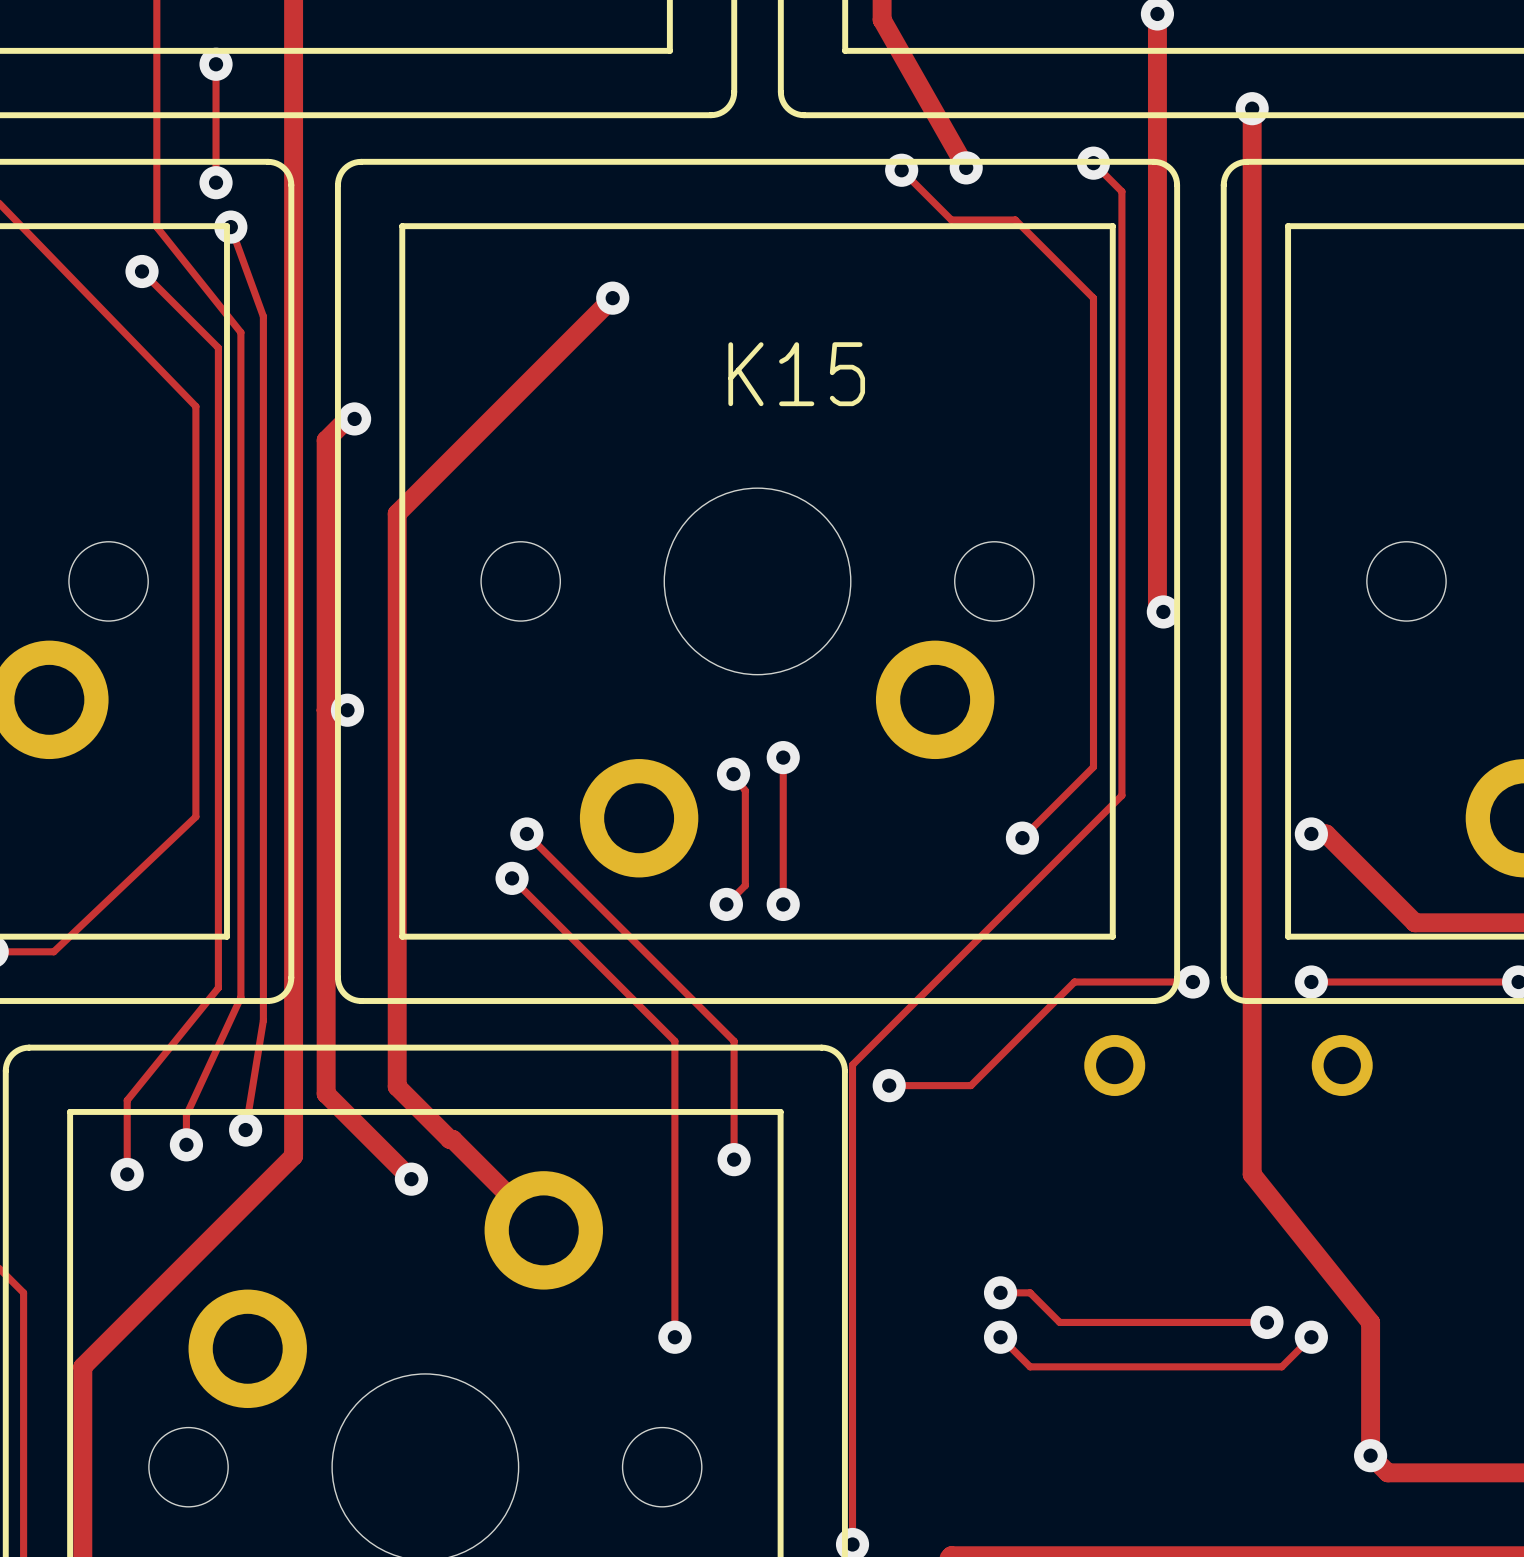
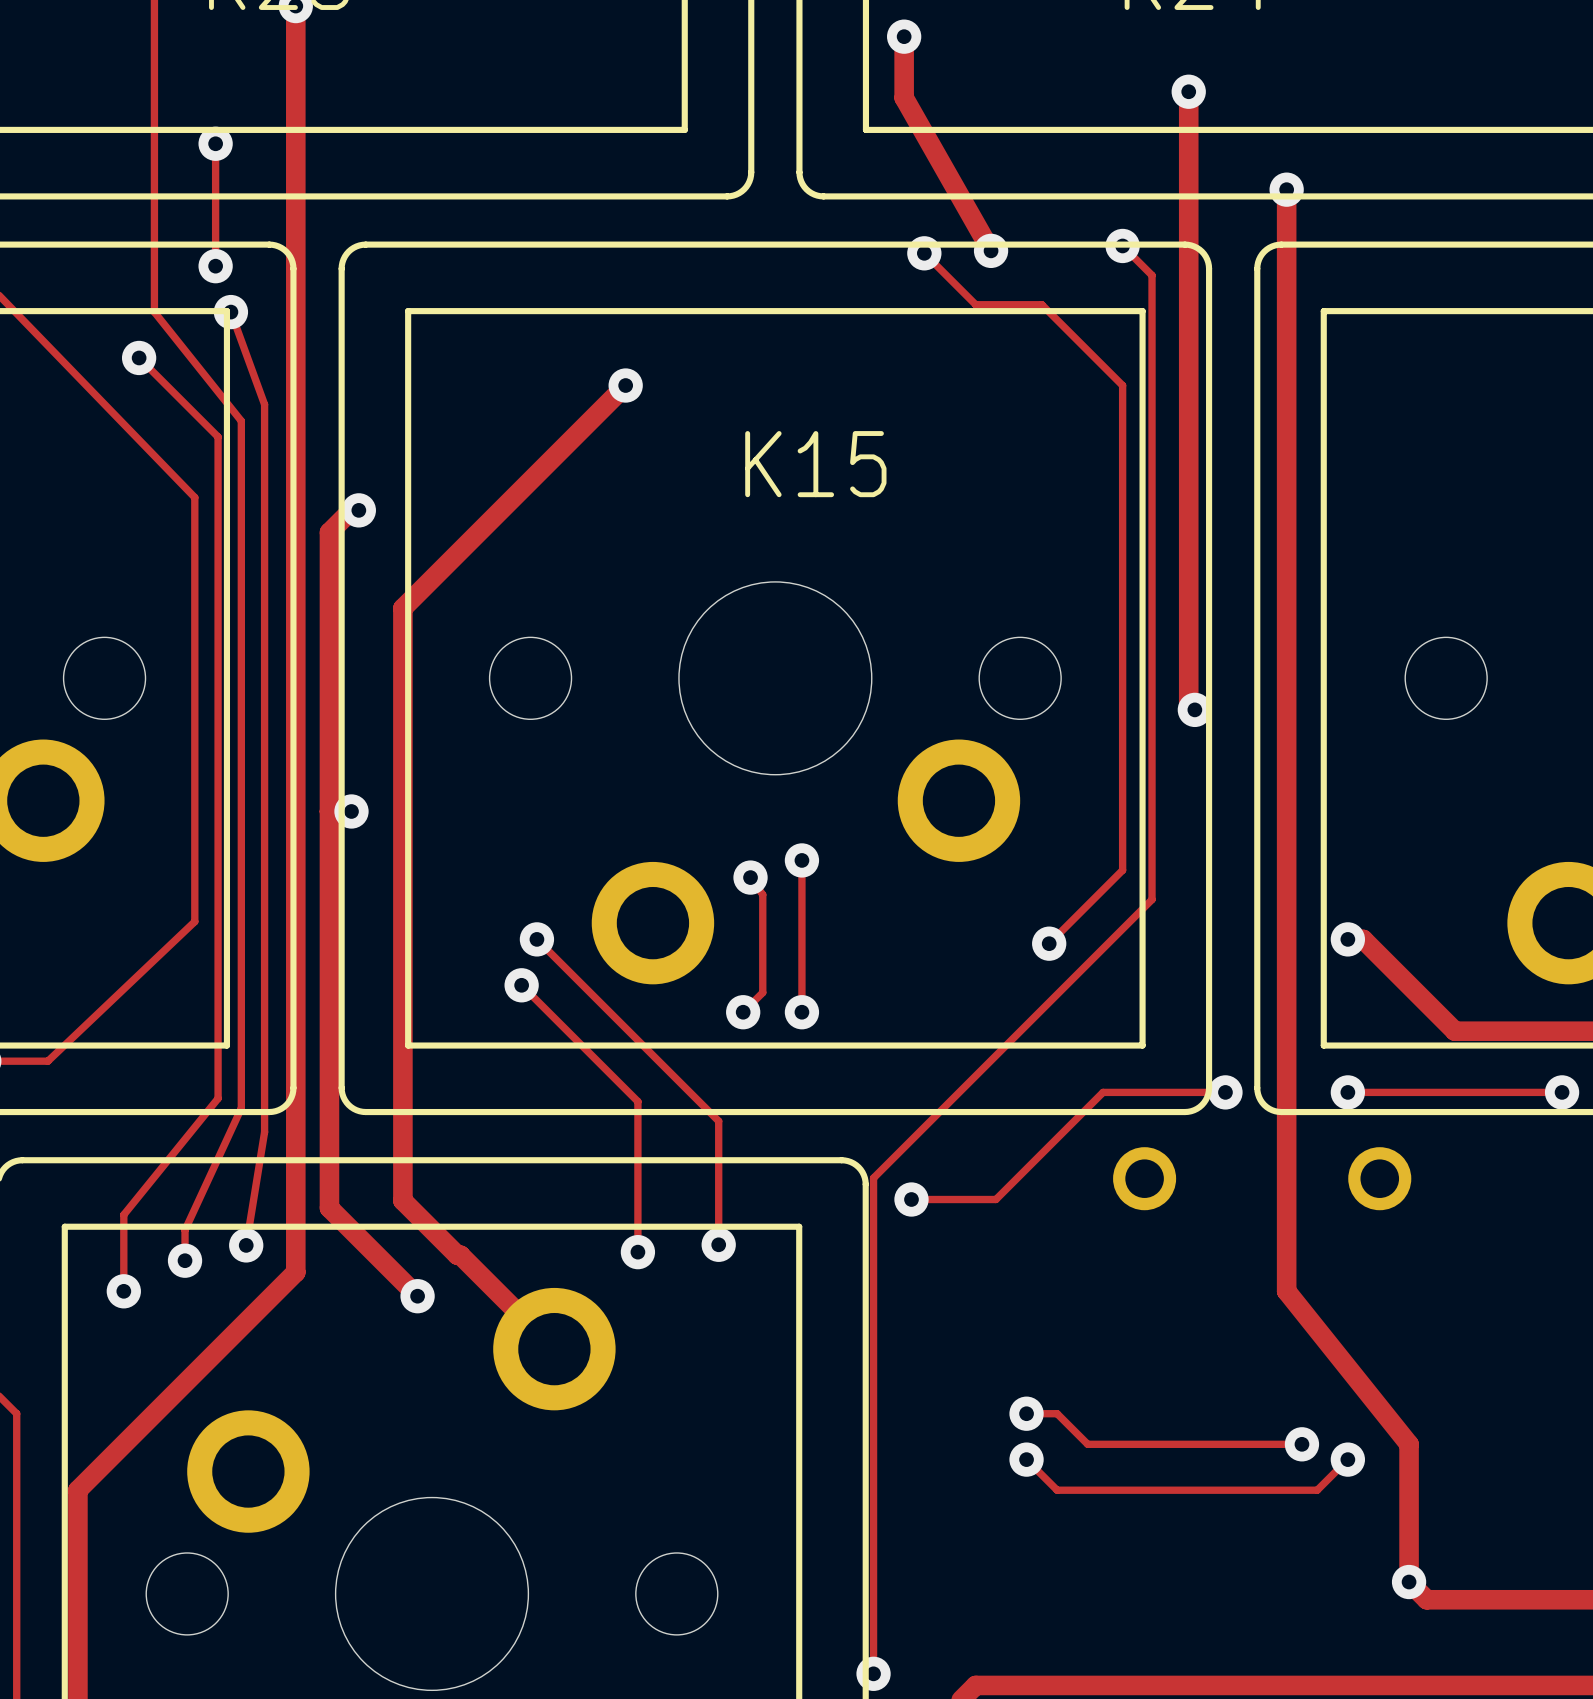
track: (624, 990) (674, 1041) (674, 1337) -> (637, 1101) (637, 1252)
track: (702, 1009) (734, 1041) (734, 1159) -> (718, 1121) (718, 1244)
via: none -> (637, 1252)
via position: (734, 1159) -> (718, 1244)
via: (674, 1337) -> none

